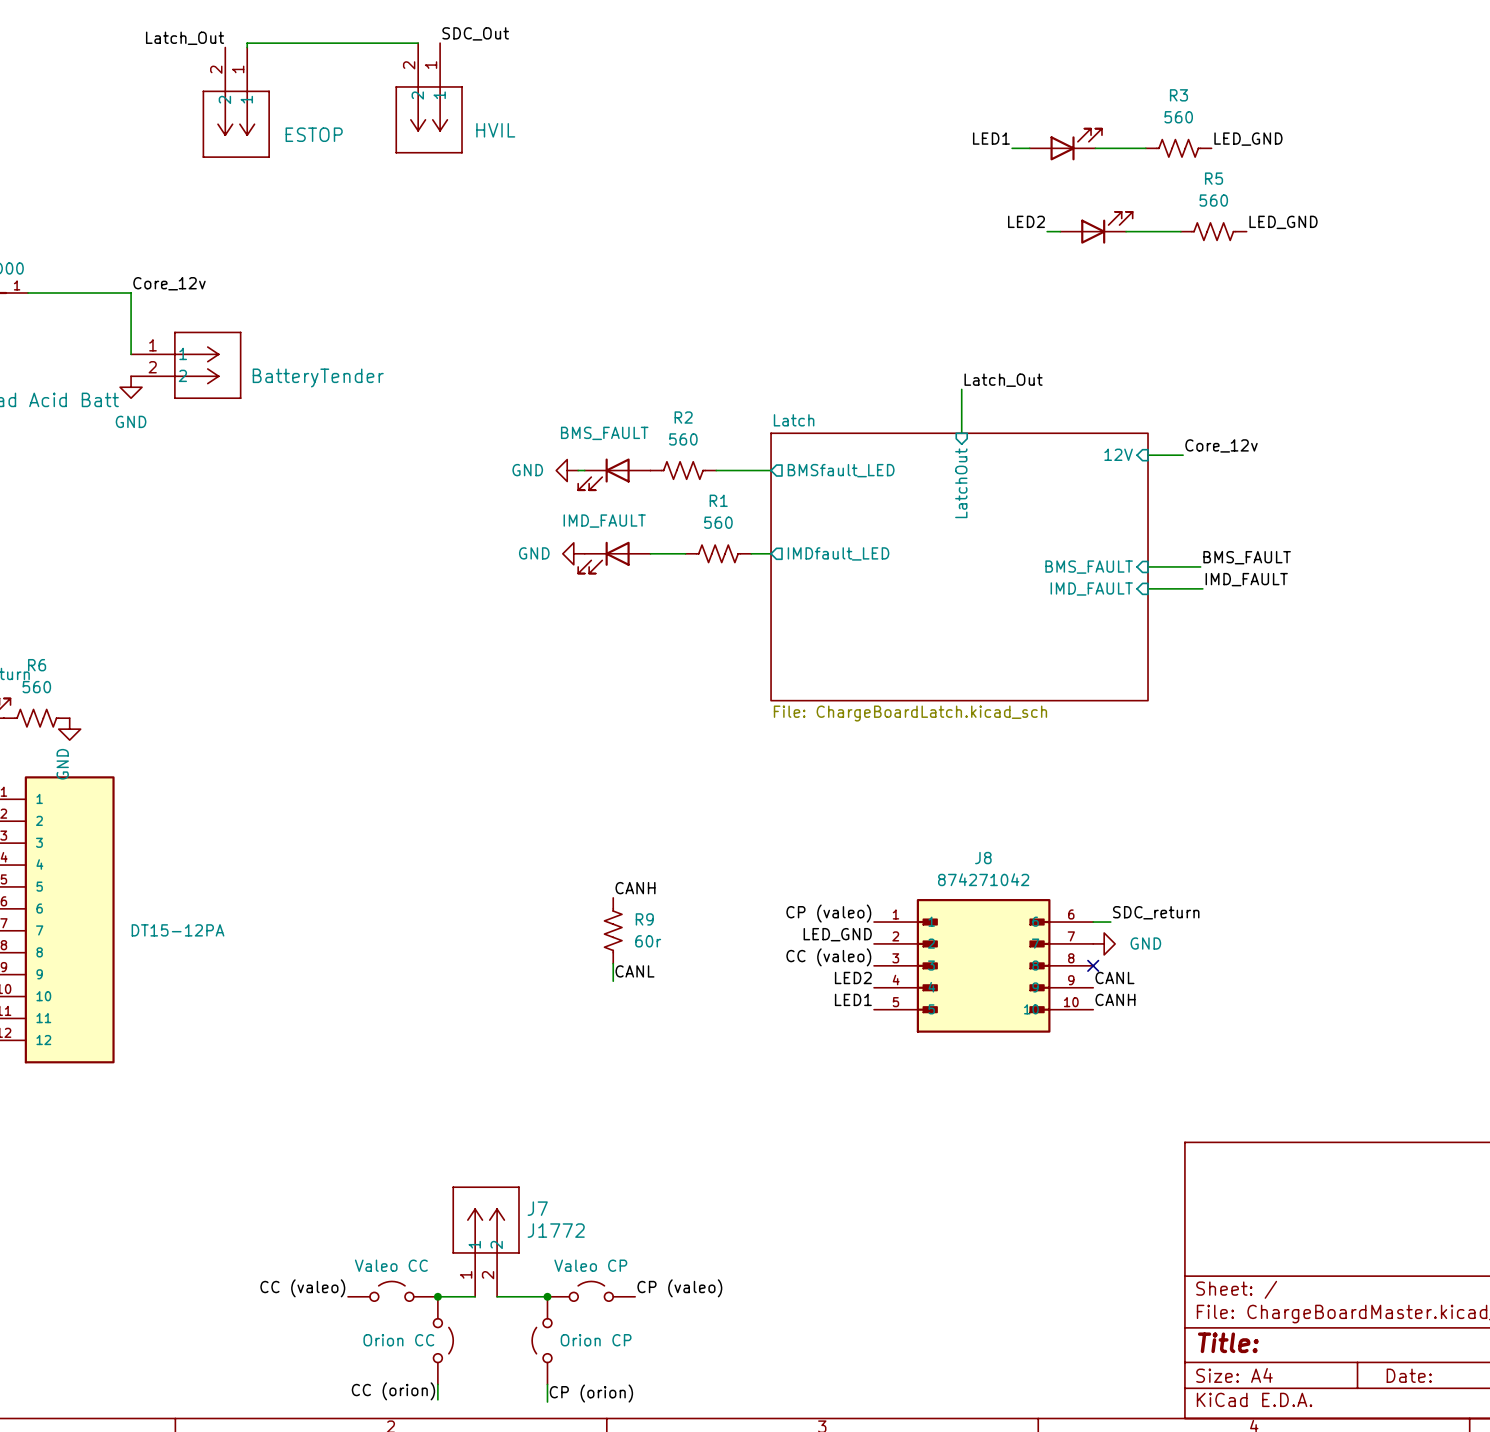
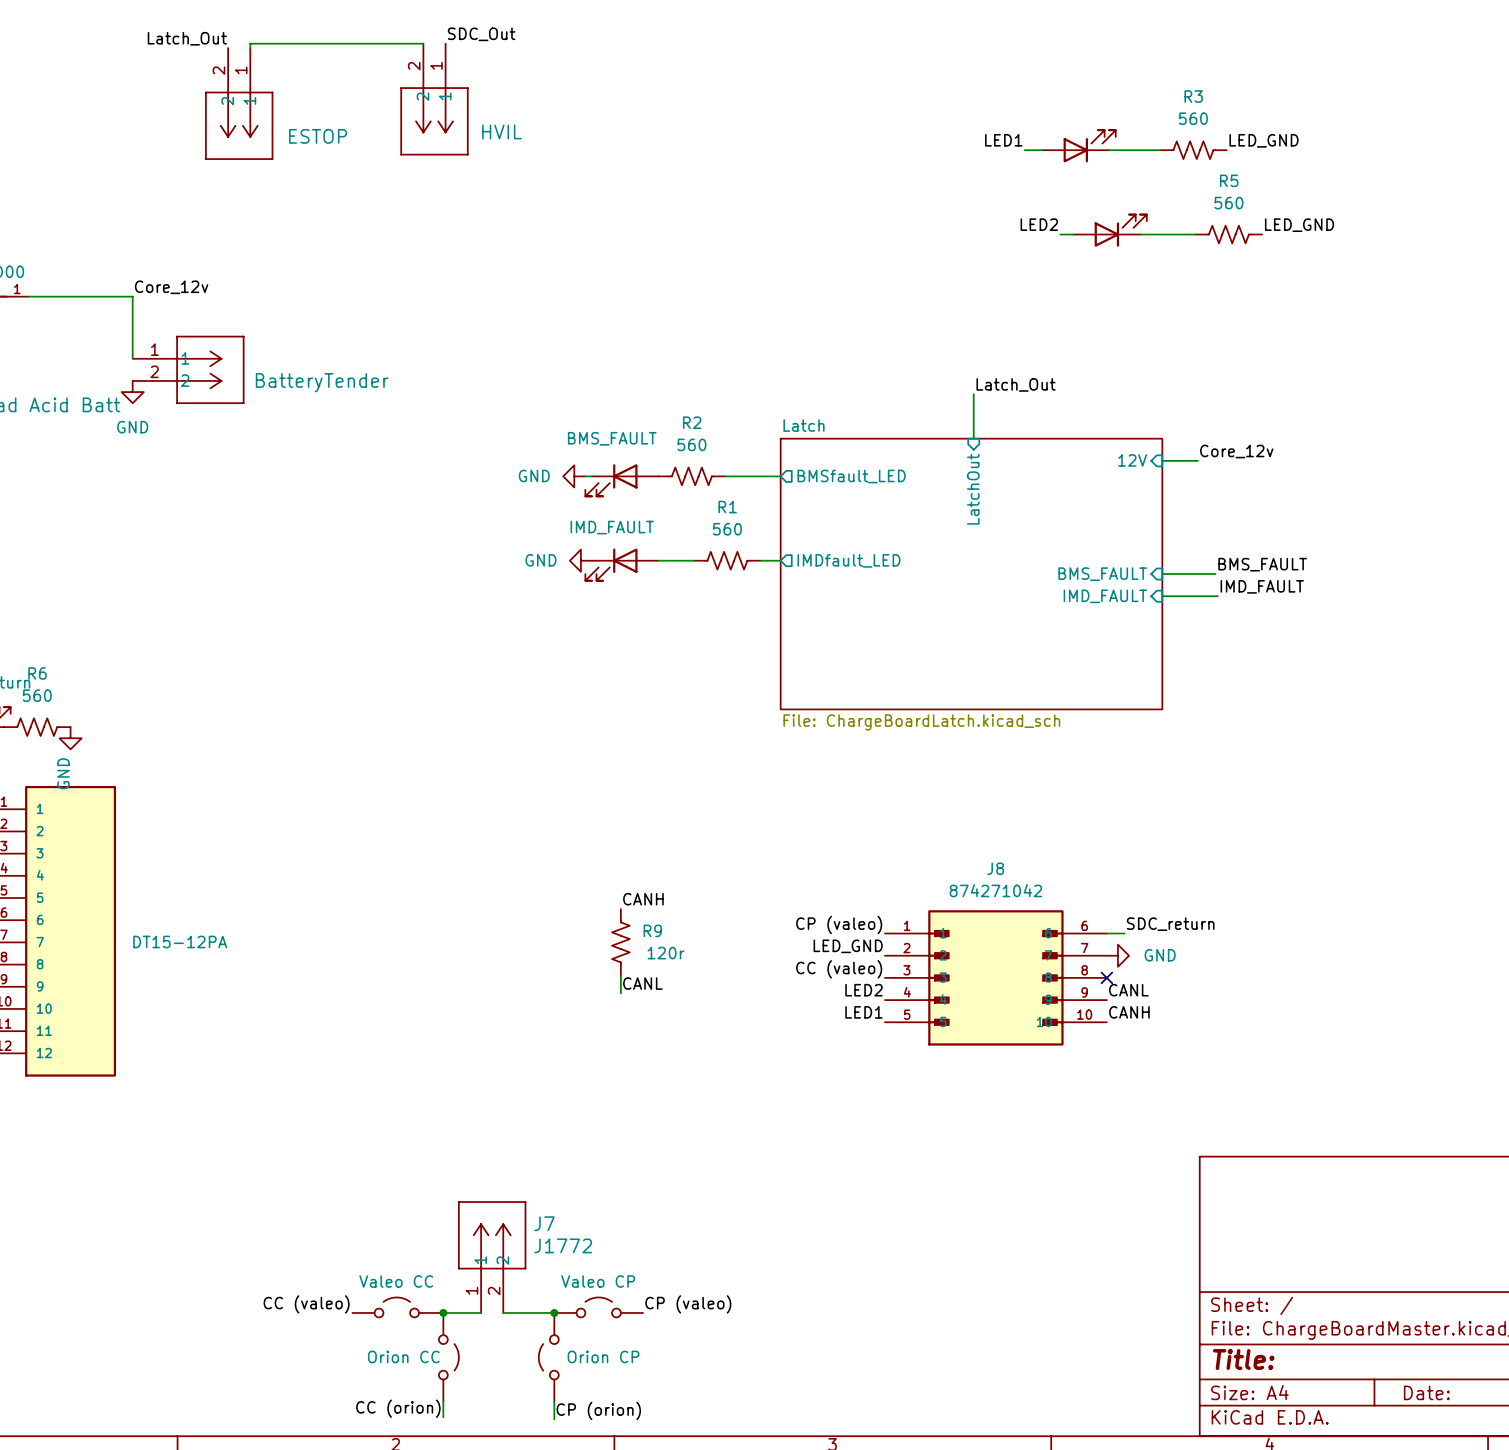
R9 value: 60r (648, 941) -> 120r (665, 953)

